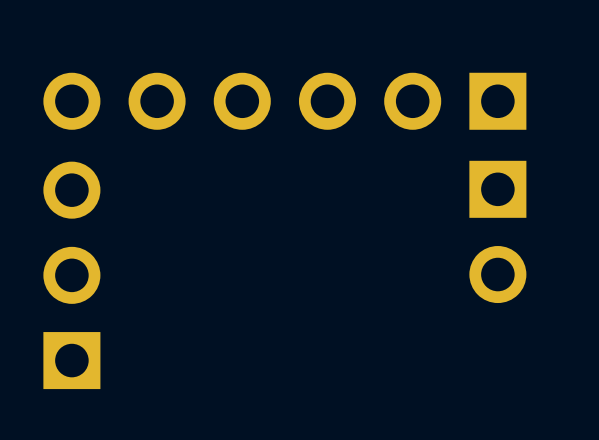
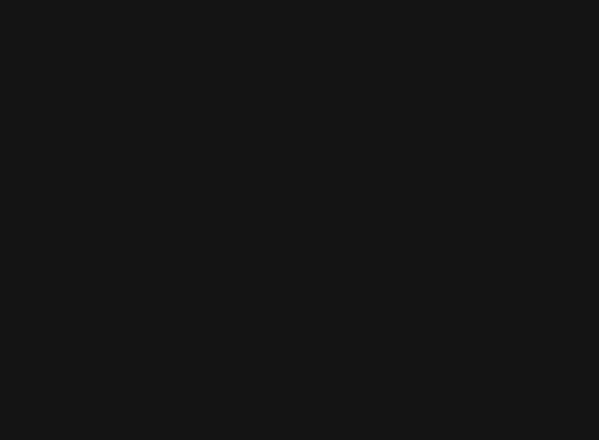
part: (284, 101) -> none
part: (497, 231) -> none
part: (71, 275) -> none

